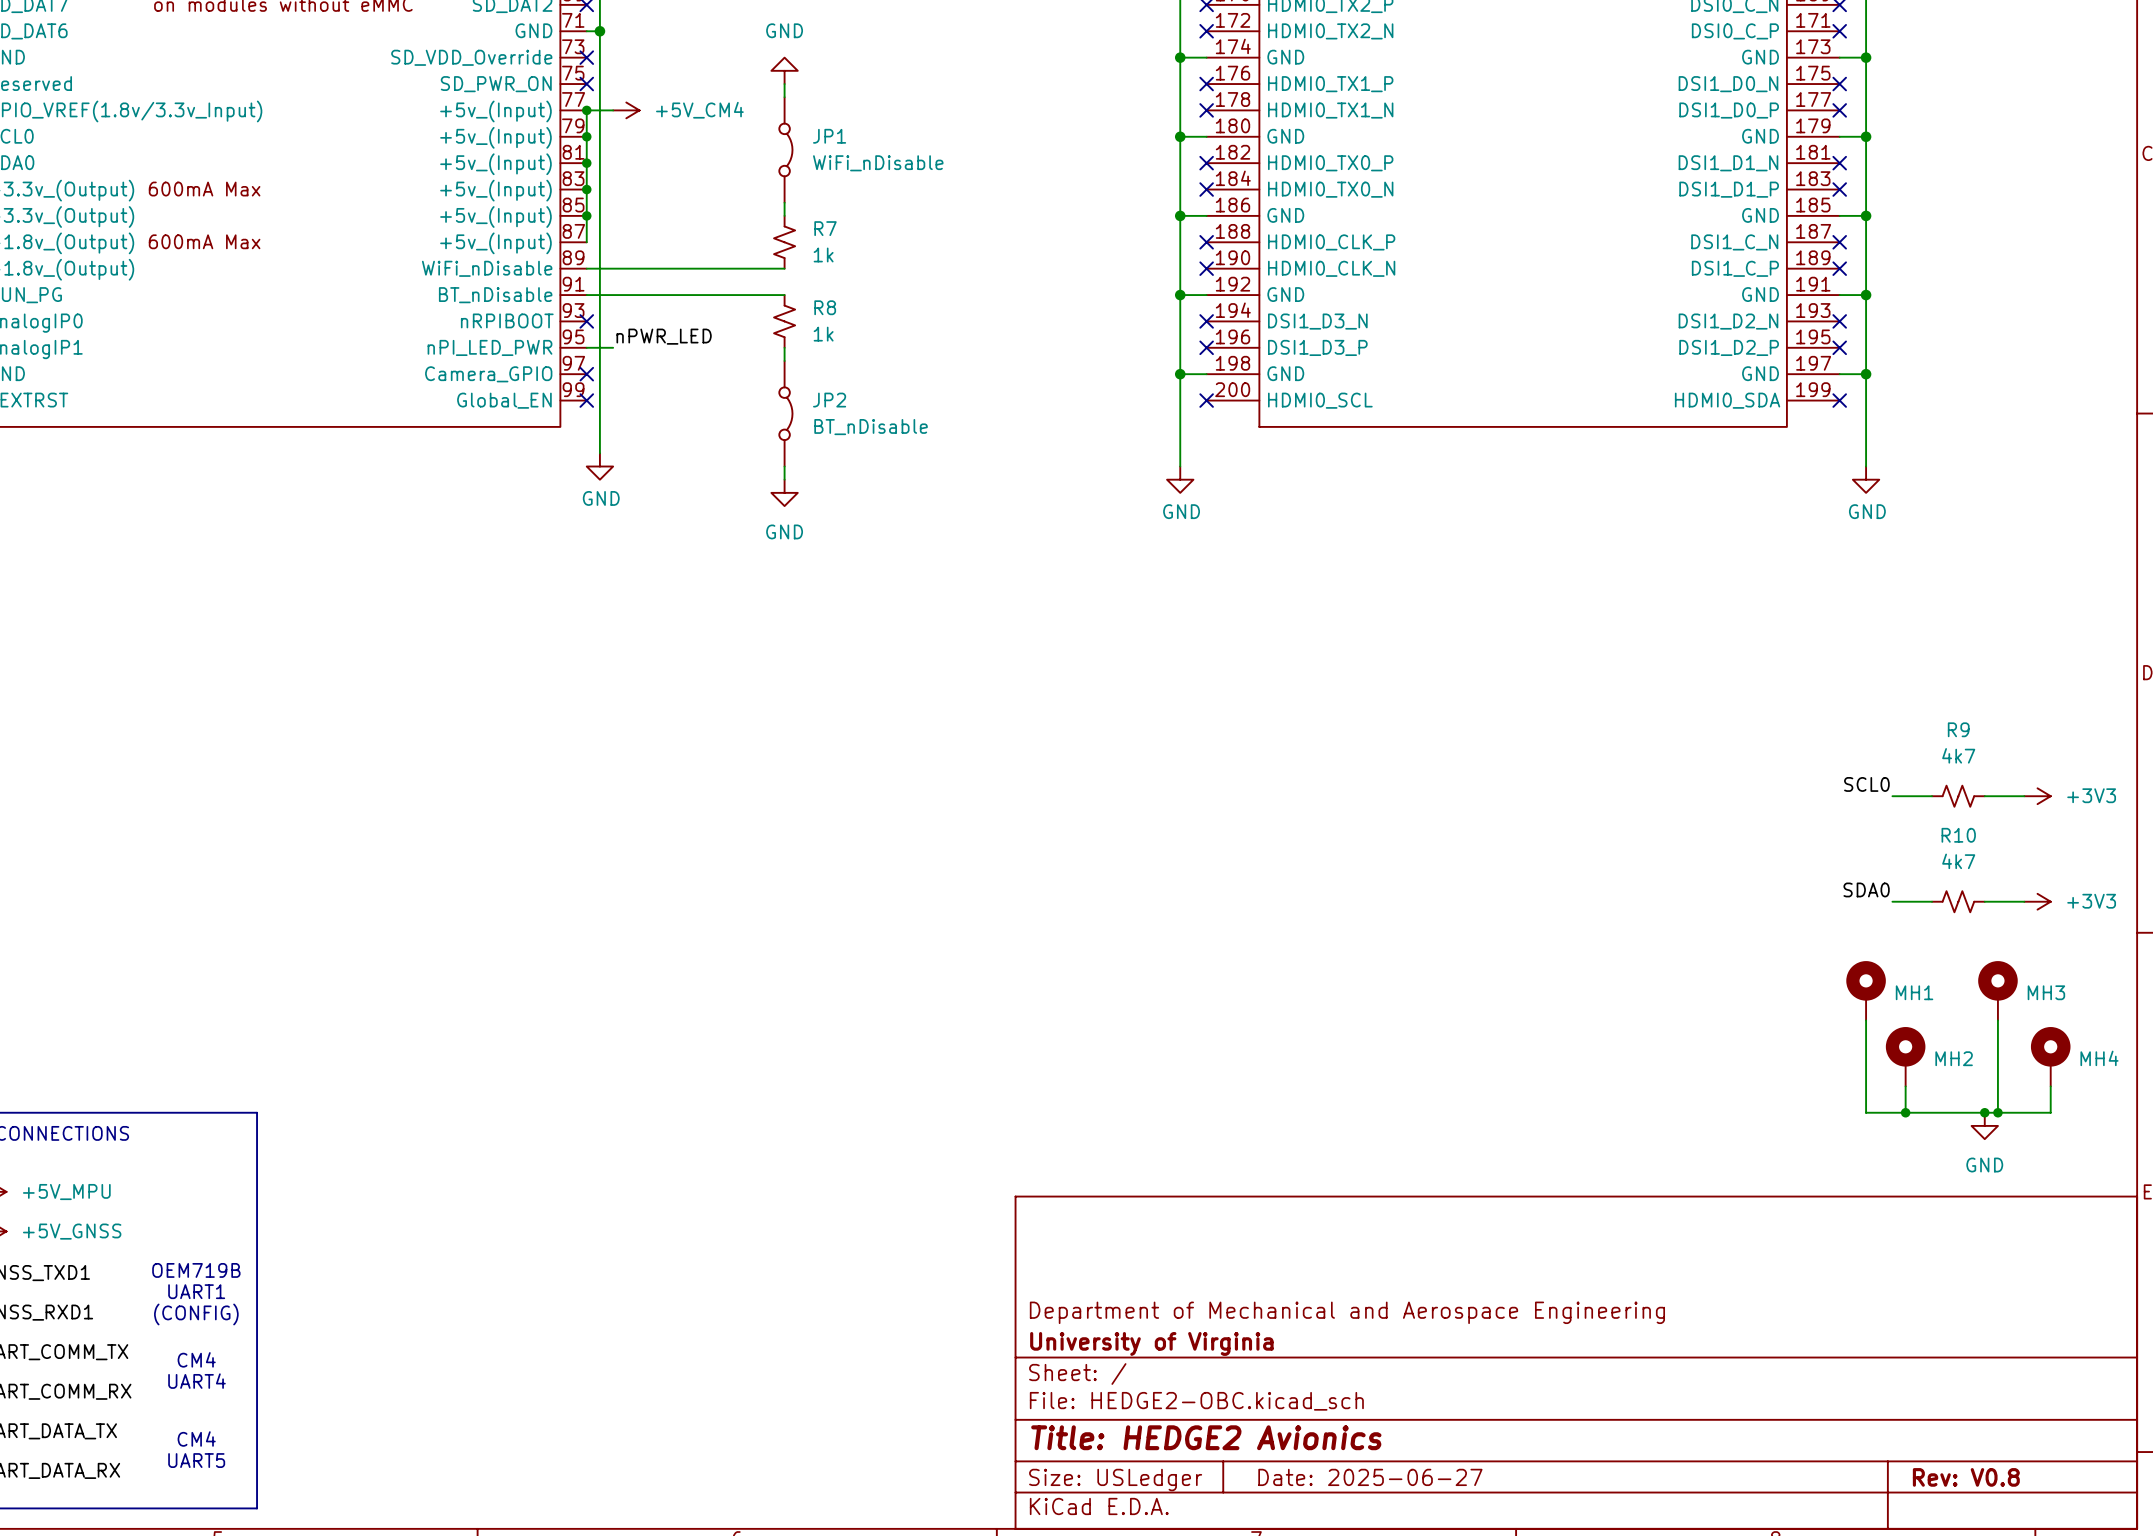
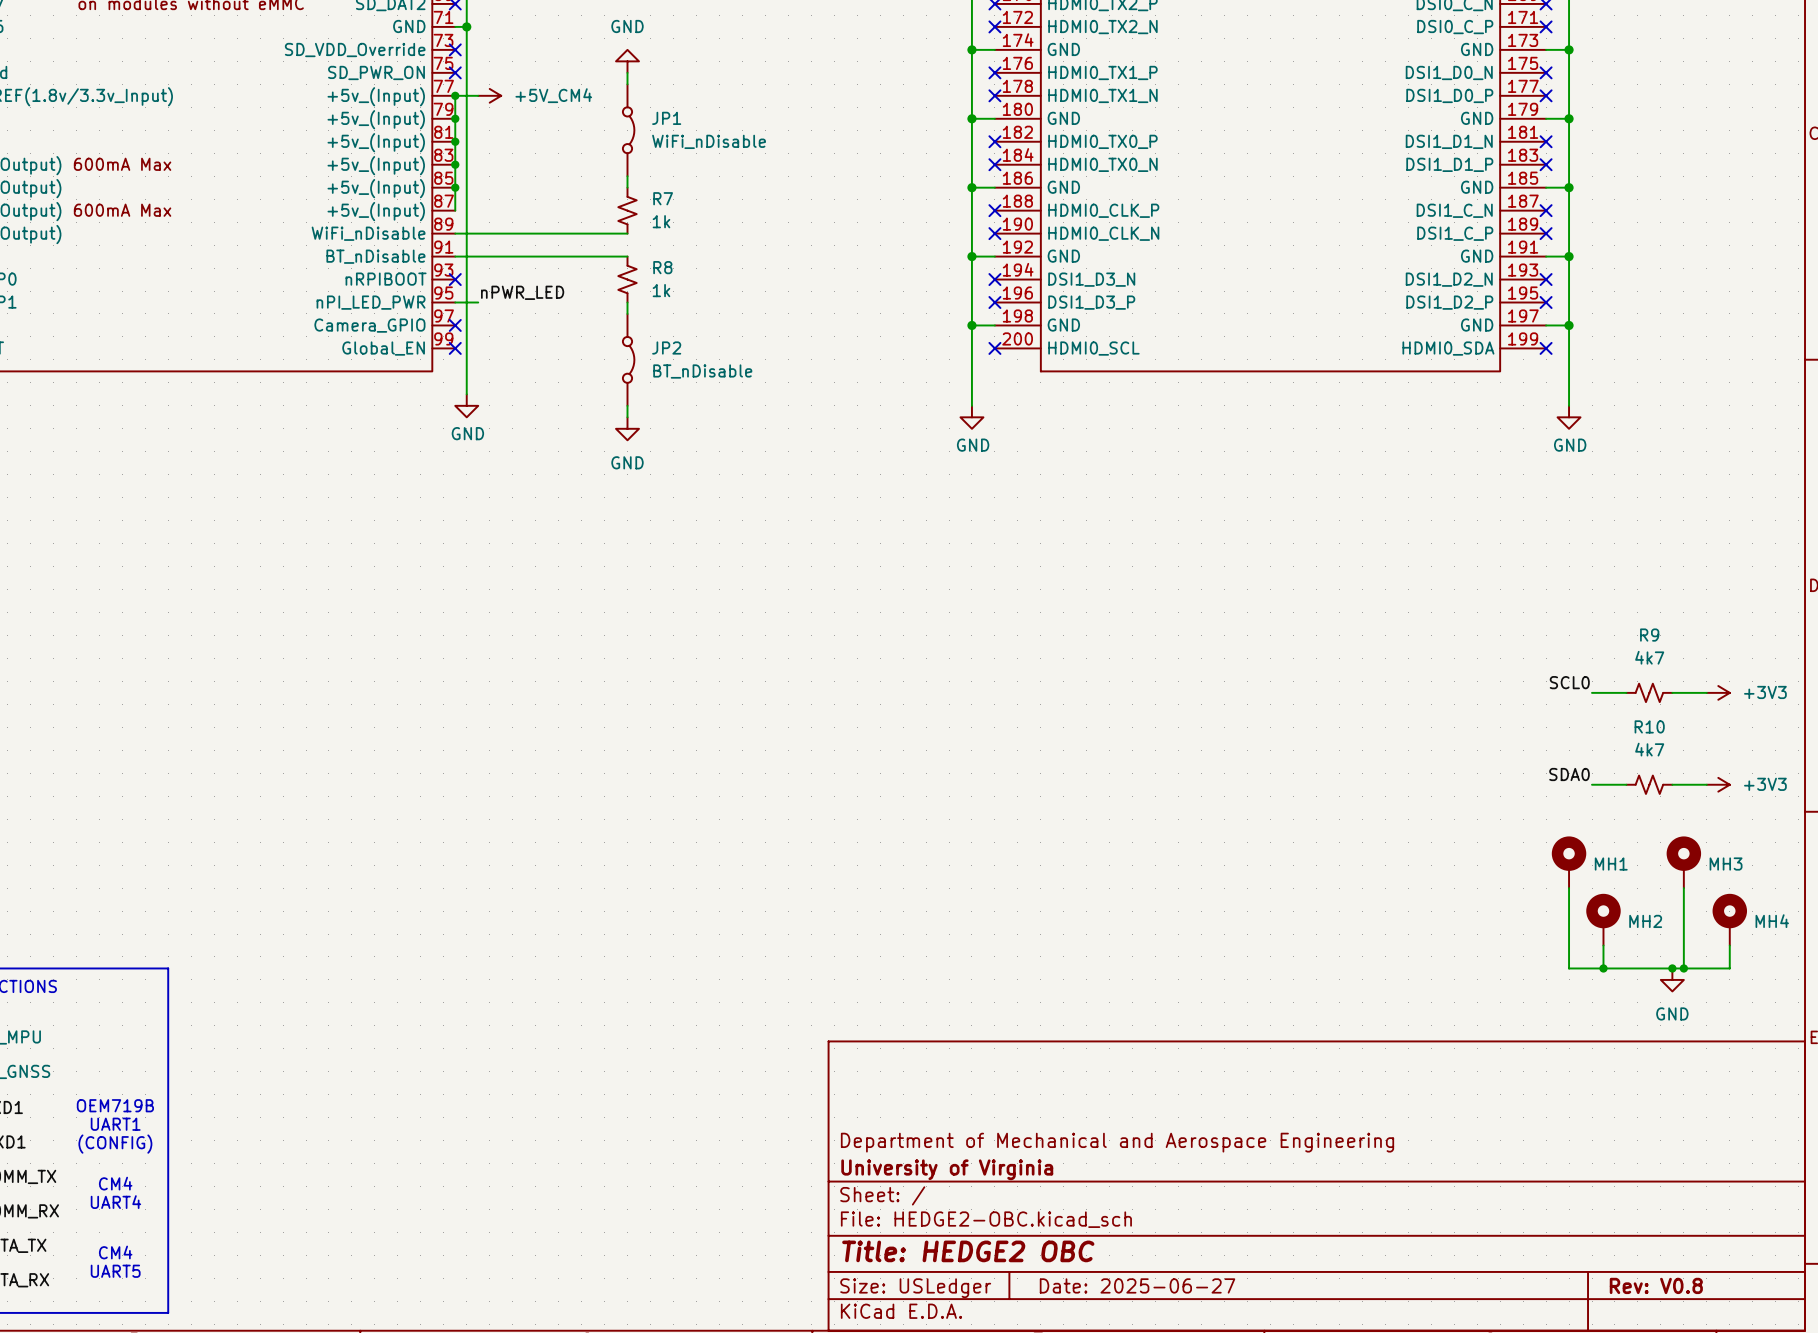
title block: Title: HEDGE2 Avionics (1206, 1437) -> Title: HEDGE2 OBC (968, 1251)

